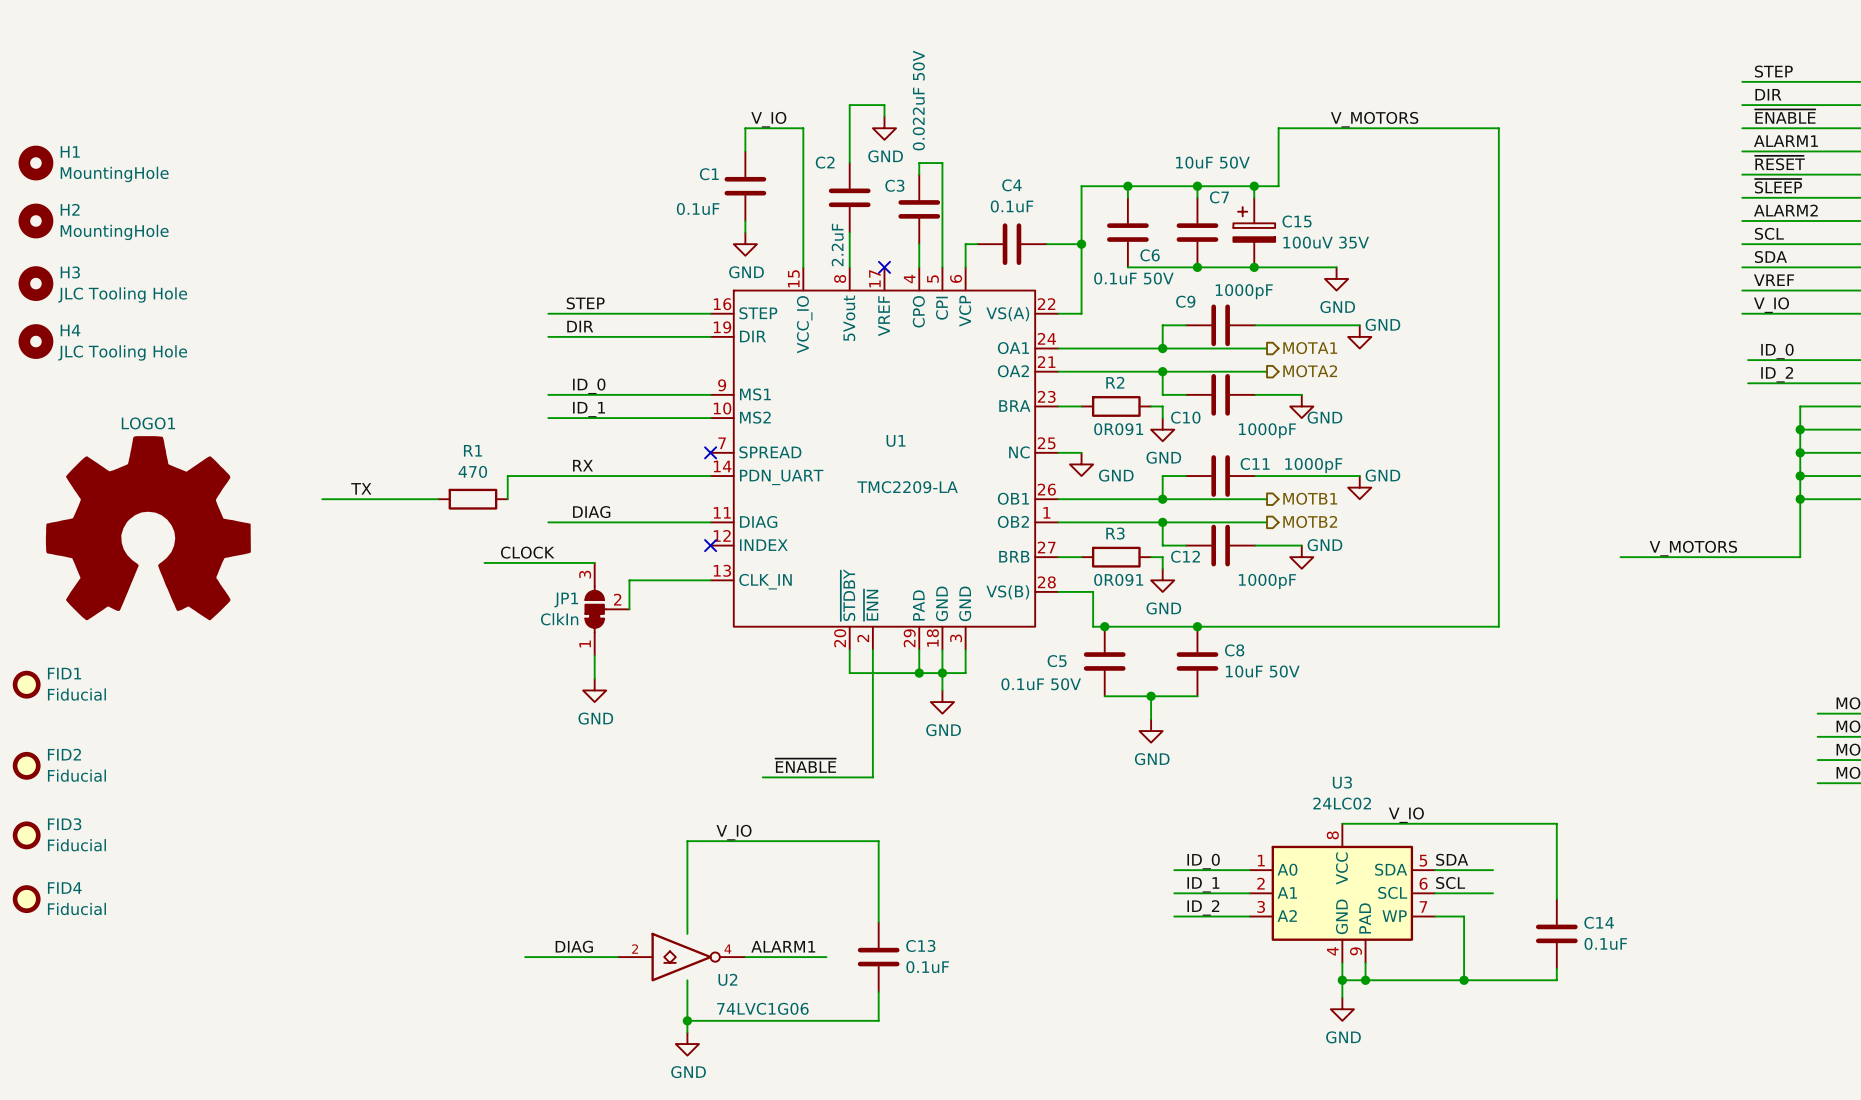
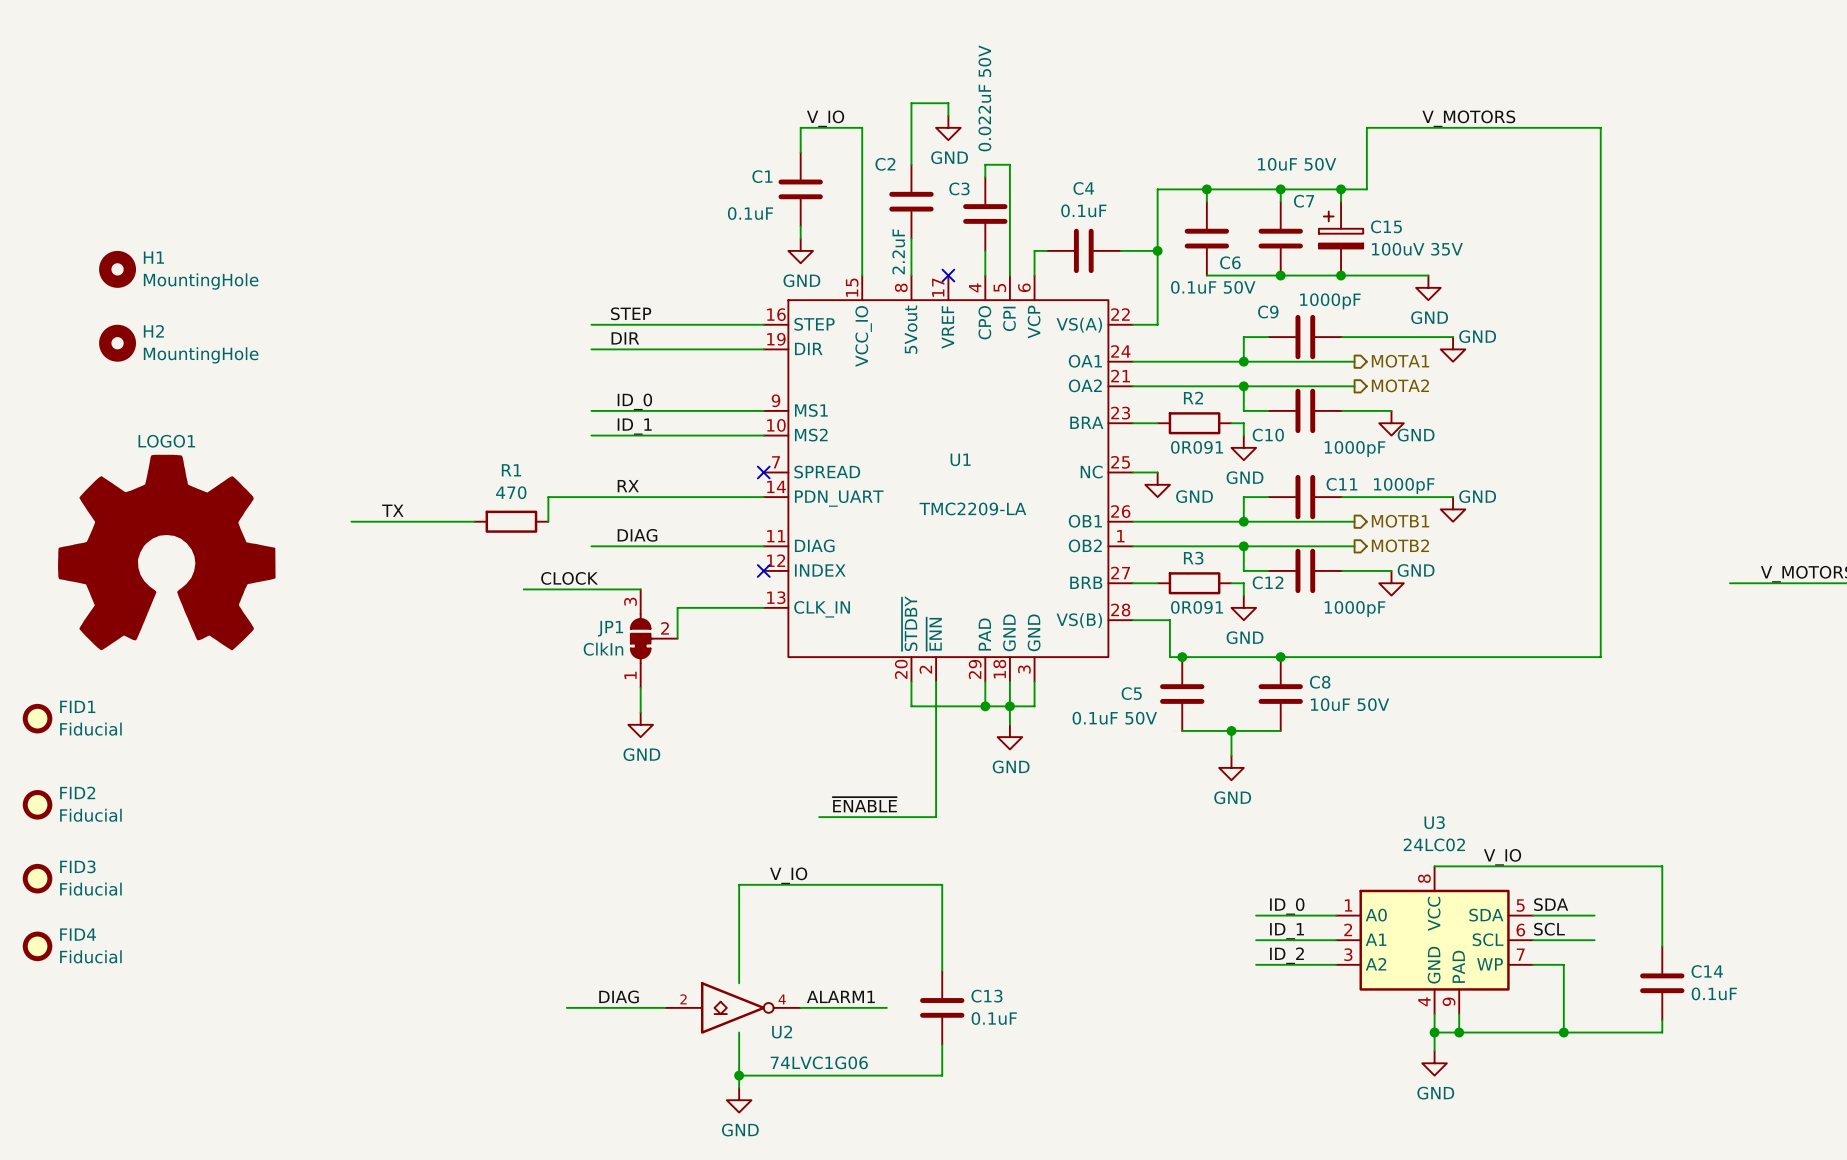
H1 position: (35, 163) -> (117, 269)
H2 position: (35, 220) -> (117, 343)
H3: JLC Tooling Hole (35, 283) -> none
H4: JLC Tooling Hole (35, 341) -> none

